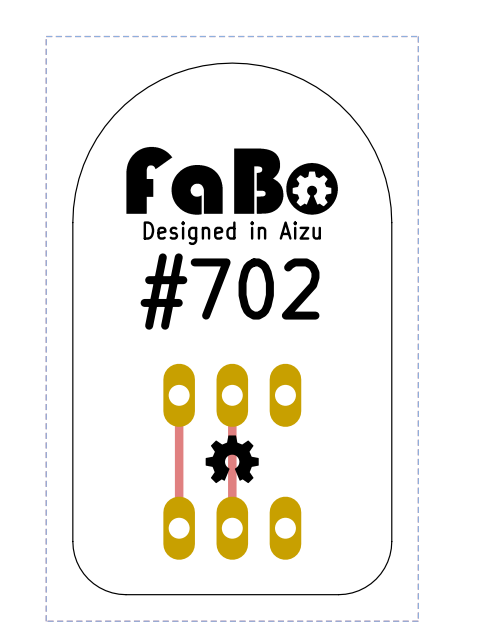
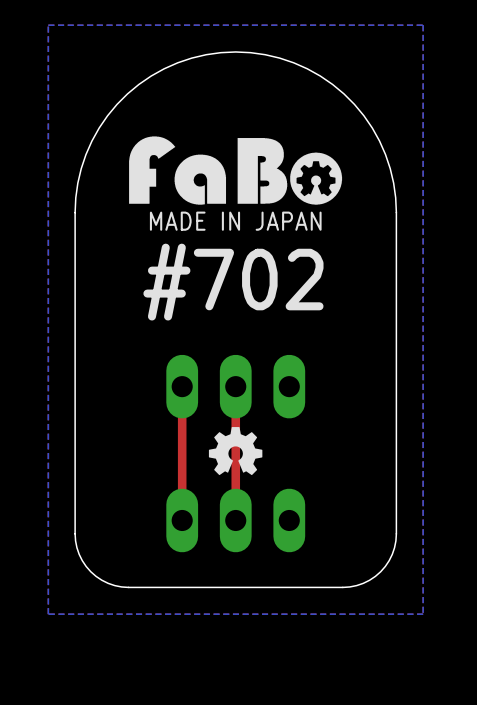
text: Designed in Aizu (232, 233) -> MADE IN JAPAN (235, 221)

